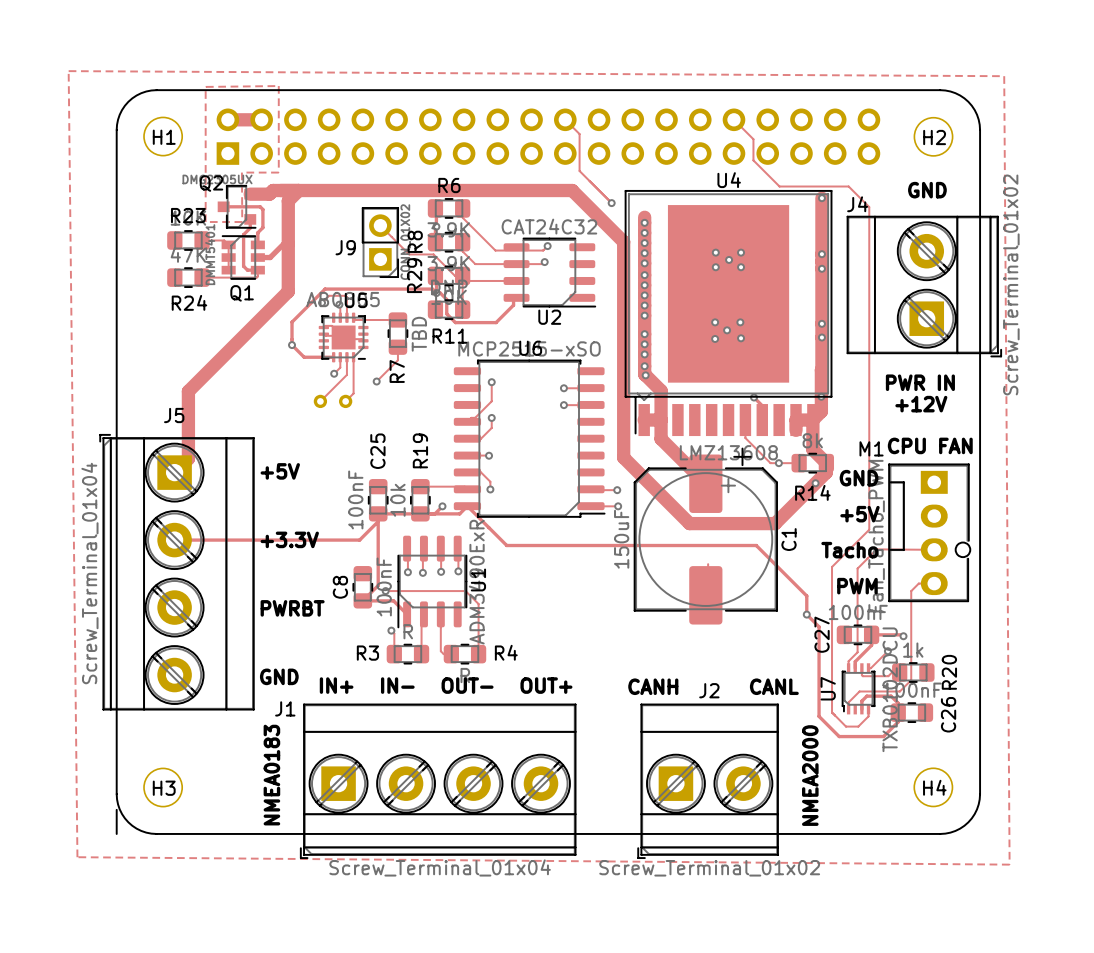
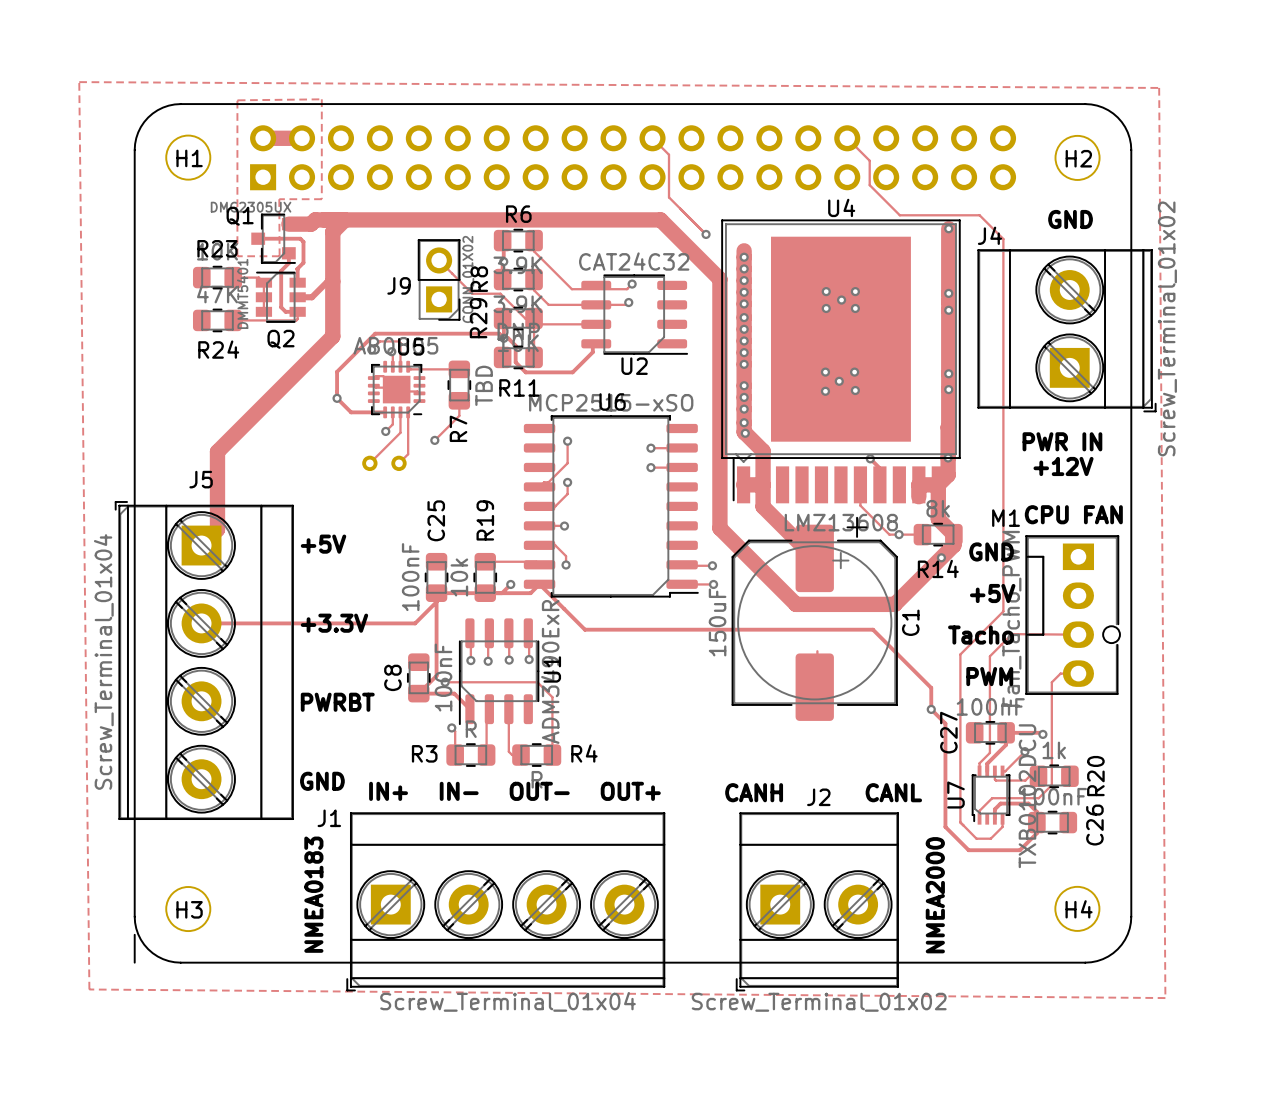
Q2 name position: Q2 (211, 183) -> Q2 (280, 339)
Q1 name position: Q1 (242, 293) -> Q1 (240, 216)

